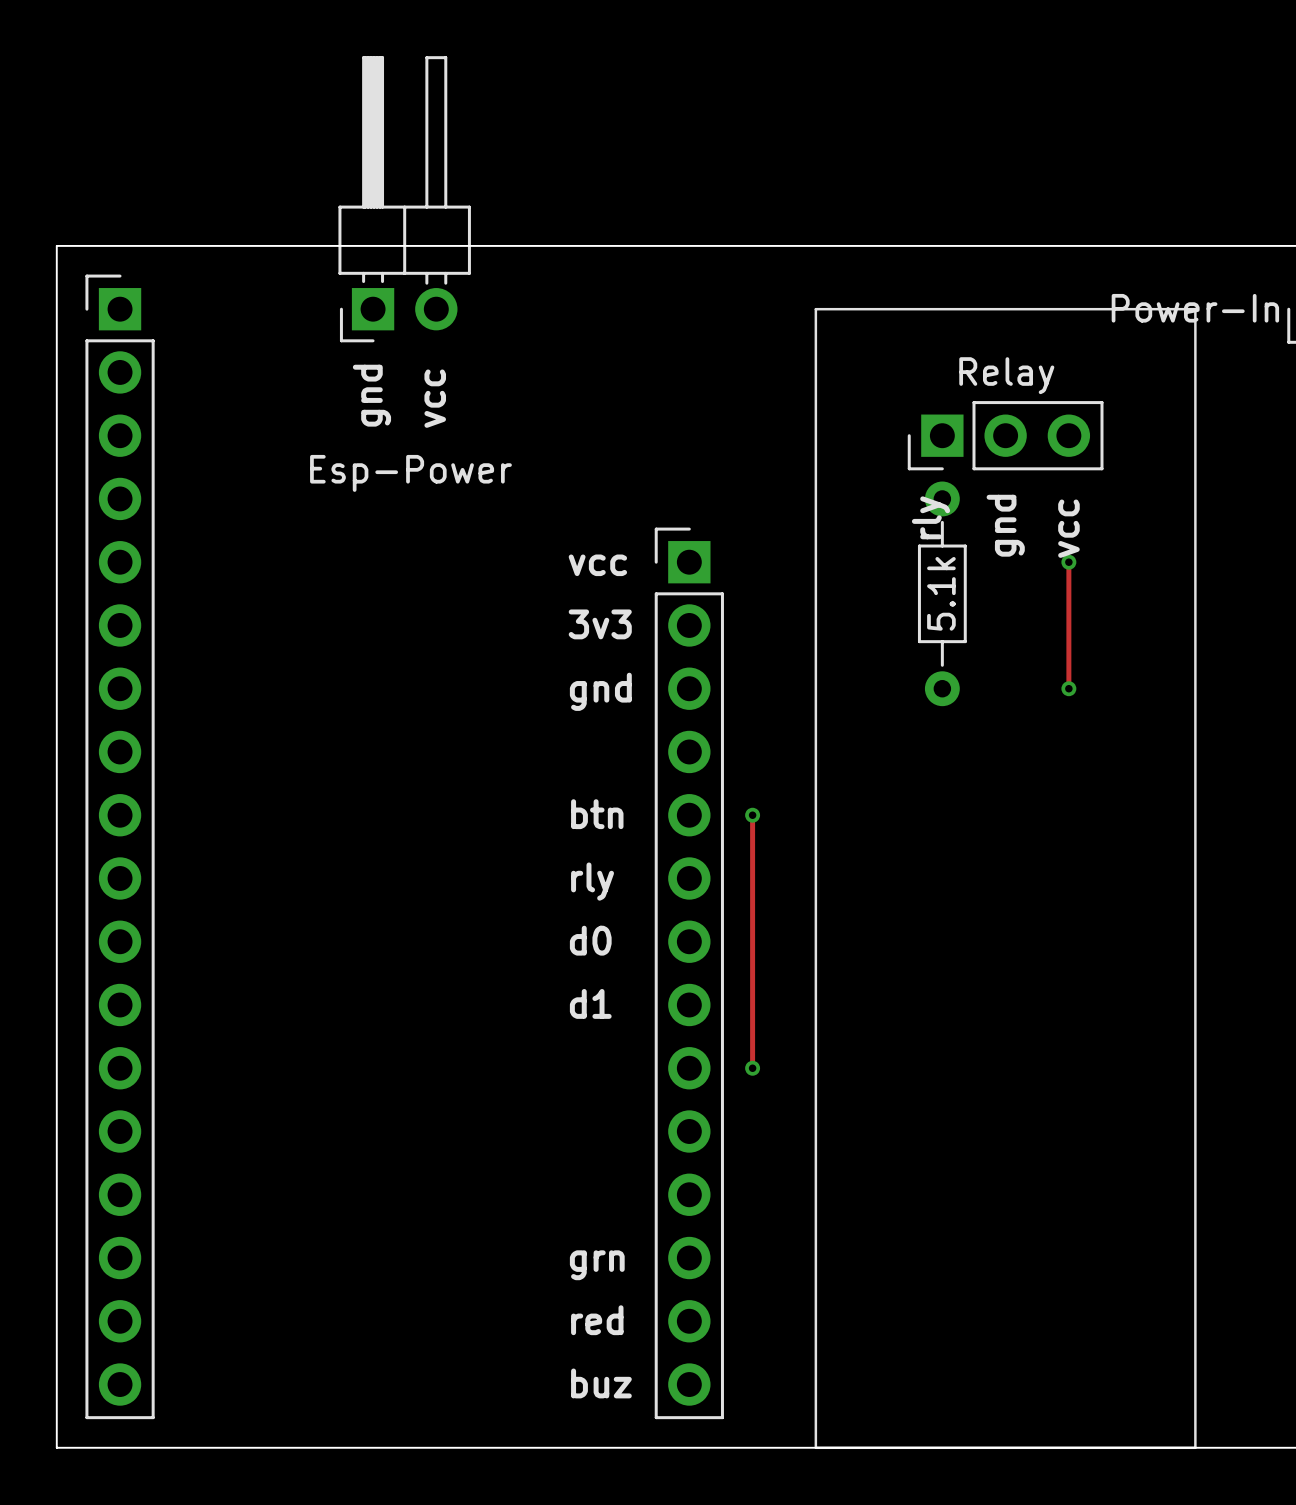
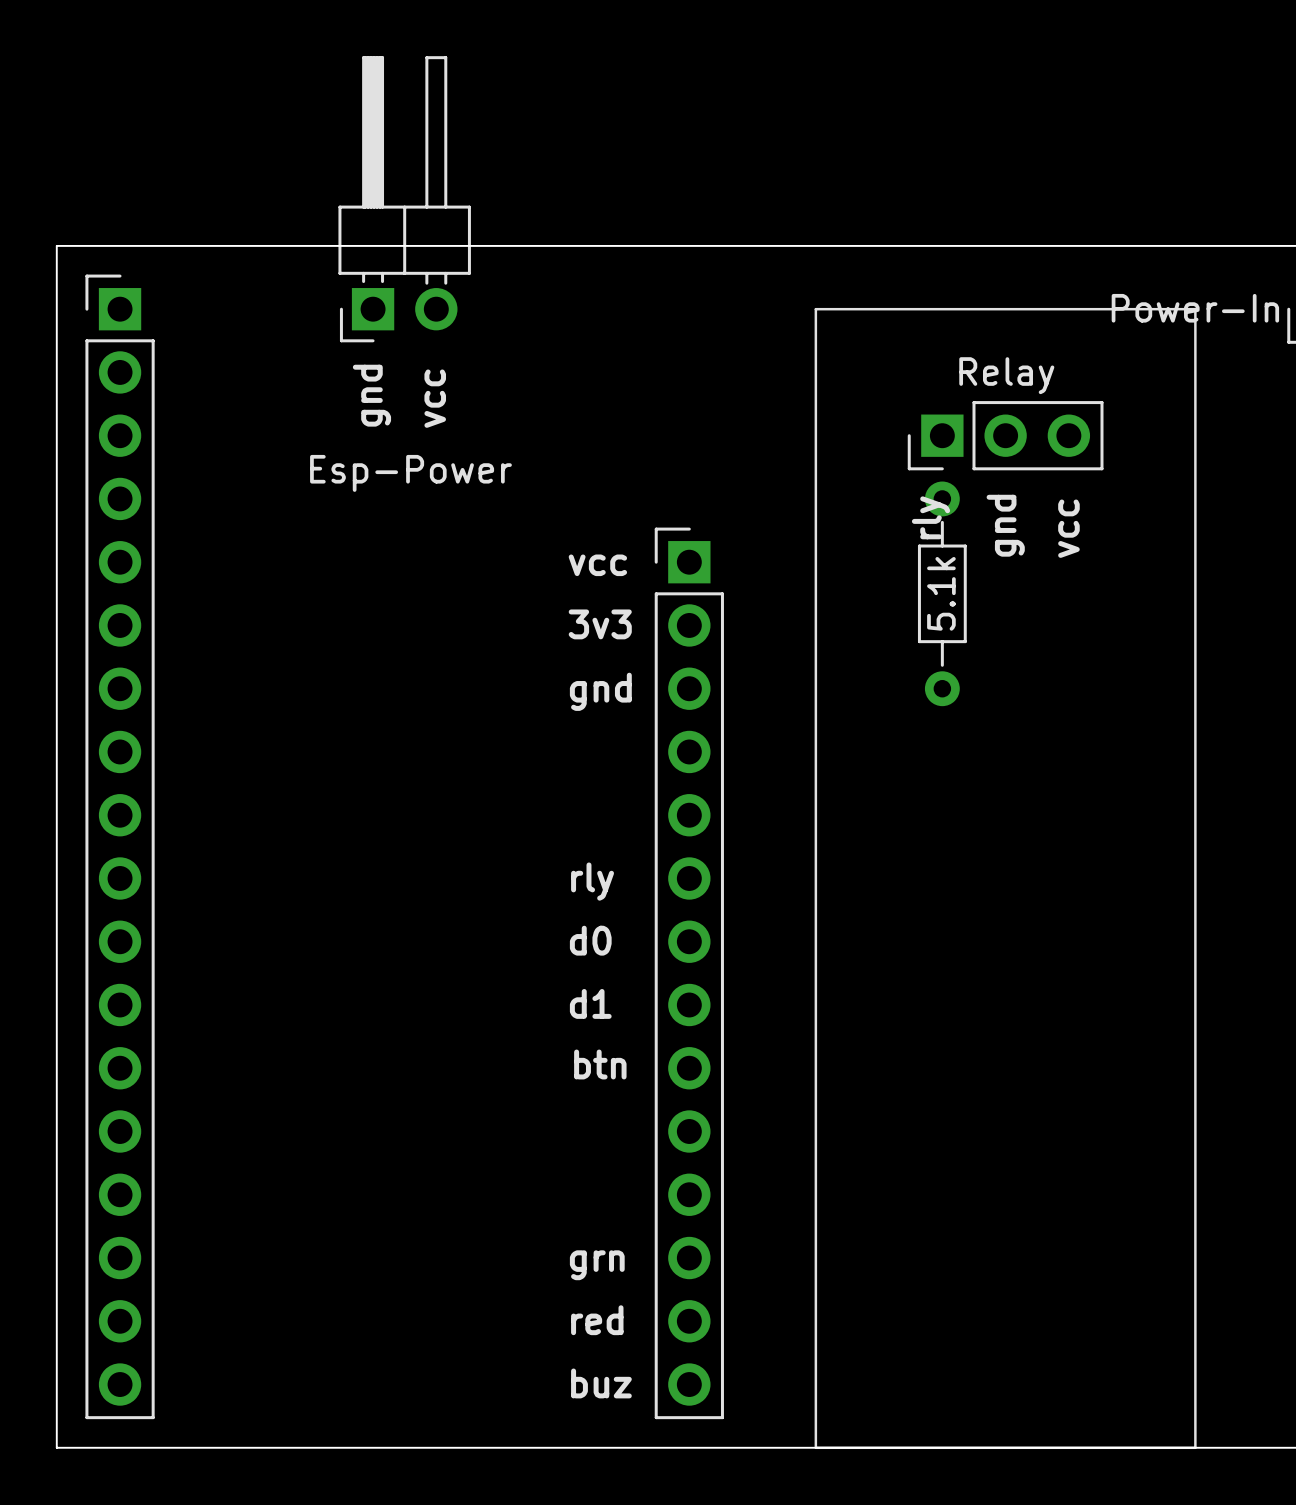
track: (1068, 562) (1068, 688) -> none
via: (1068, 562) -> none
via: (1068, 688) -> none
text position: btn (597, 814) -> btn (600, 1064)
track: (752, 815) (752, 1068) -> none
via: (752, 815) -> none
via: (752, 1068) -> none

